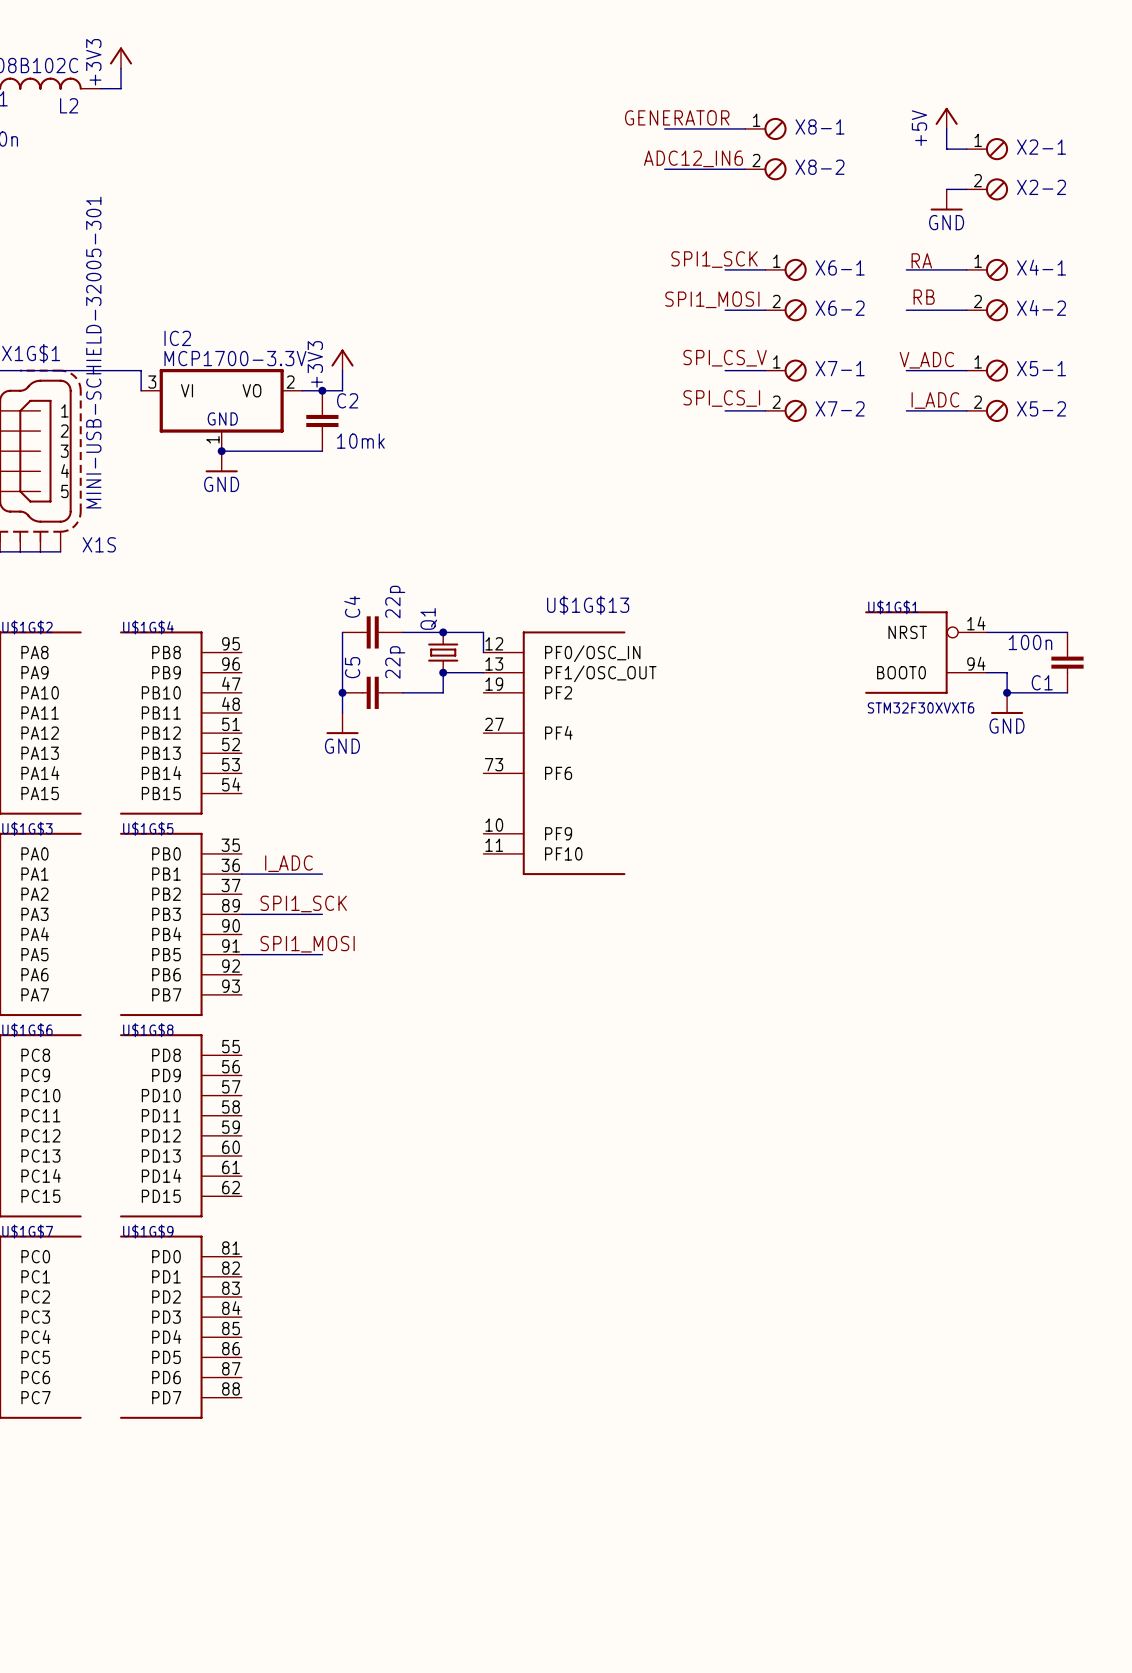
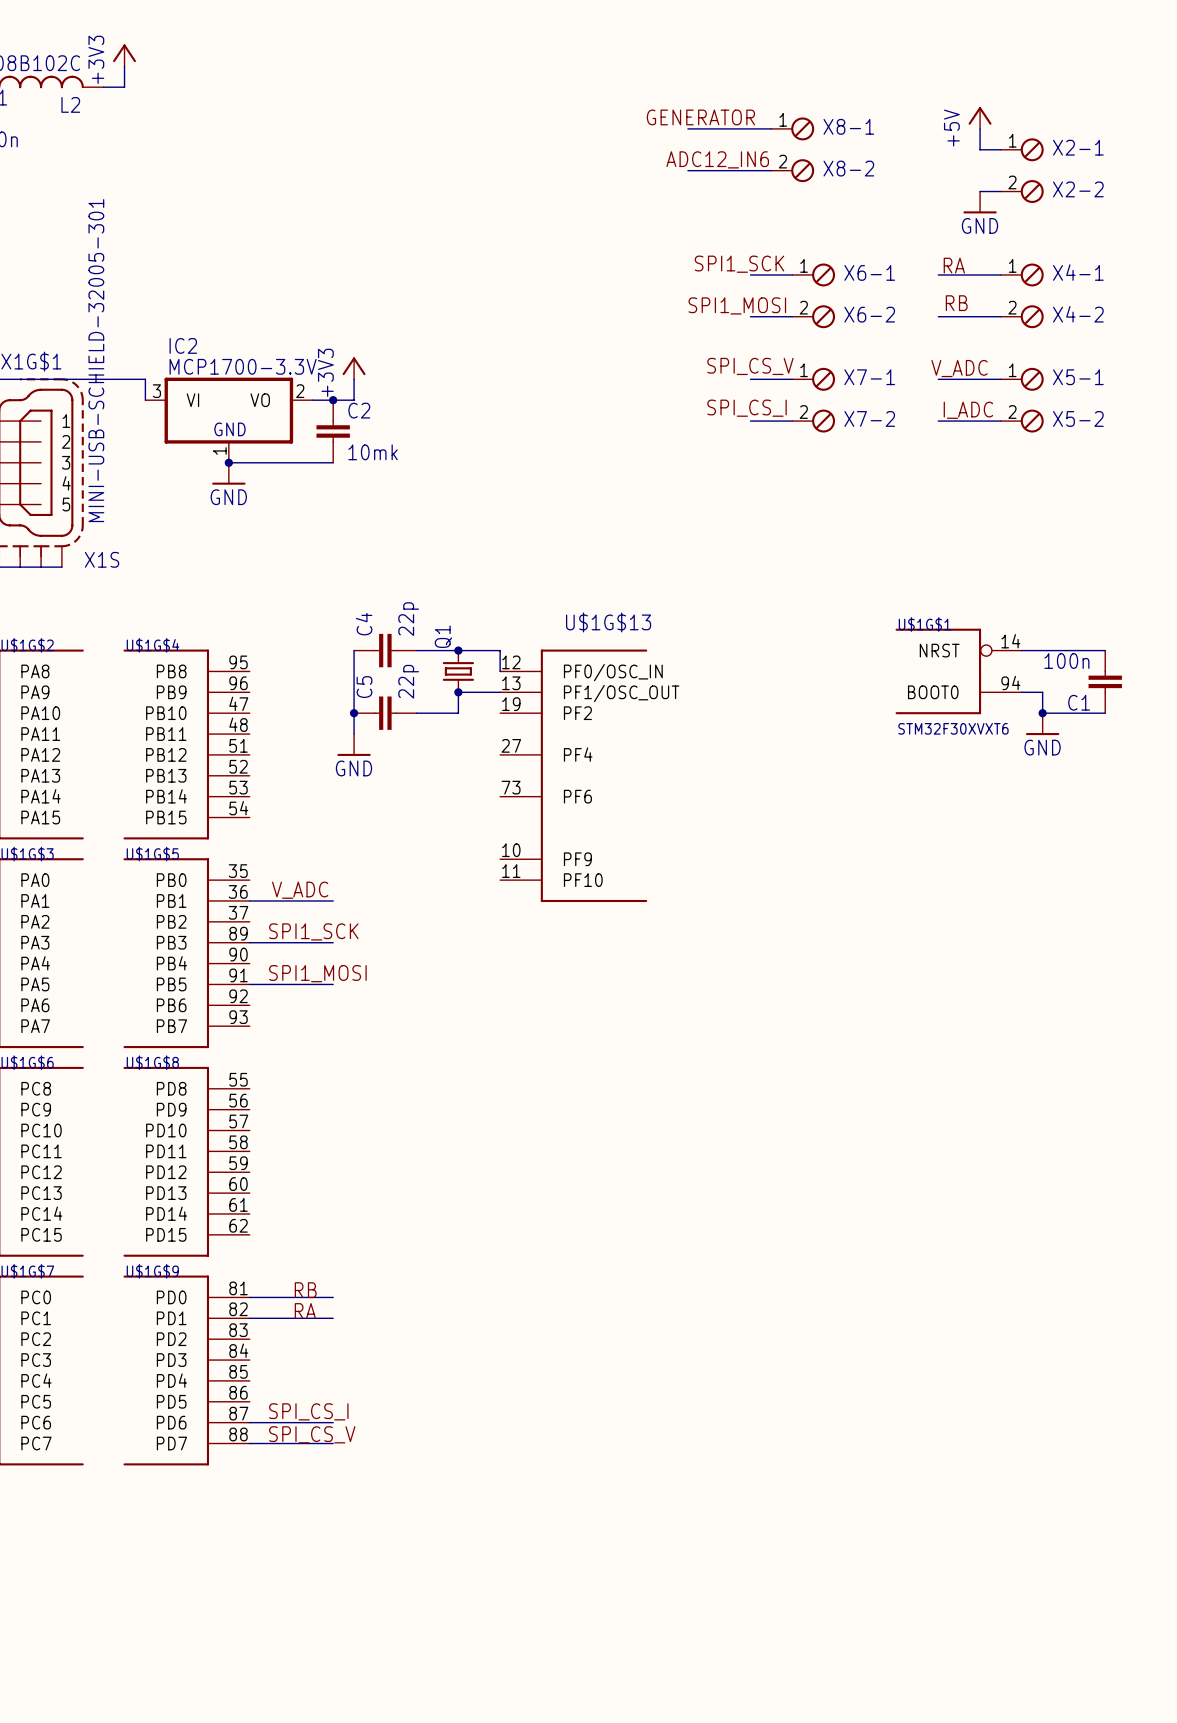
label: I_ADC (288, 863) -> V_ADC (300, 890)
label: none -> RB (305, 1290)
wire: none -> (249, 1297) (333, 1297)
label: none -> RA (305, 1311)
wire: none -> (249, 1318) (333, 1318)
label: none -> SPI_CS_I (308, 1411)
wire: none -> (249, 1422) (333, 1422)
label: none -> SPI_CS_V (312, 1434)
wire: none -> (249, 1443) (333, 1443)

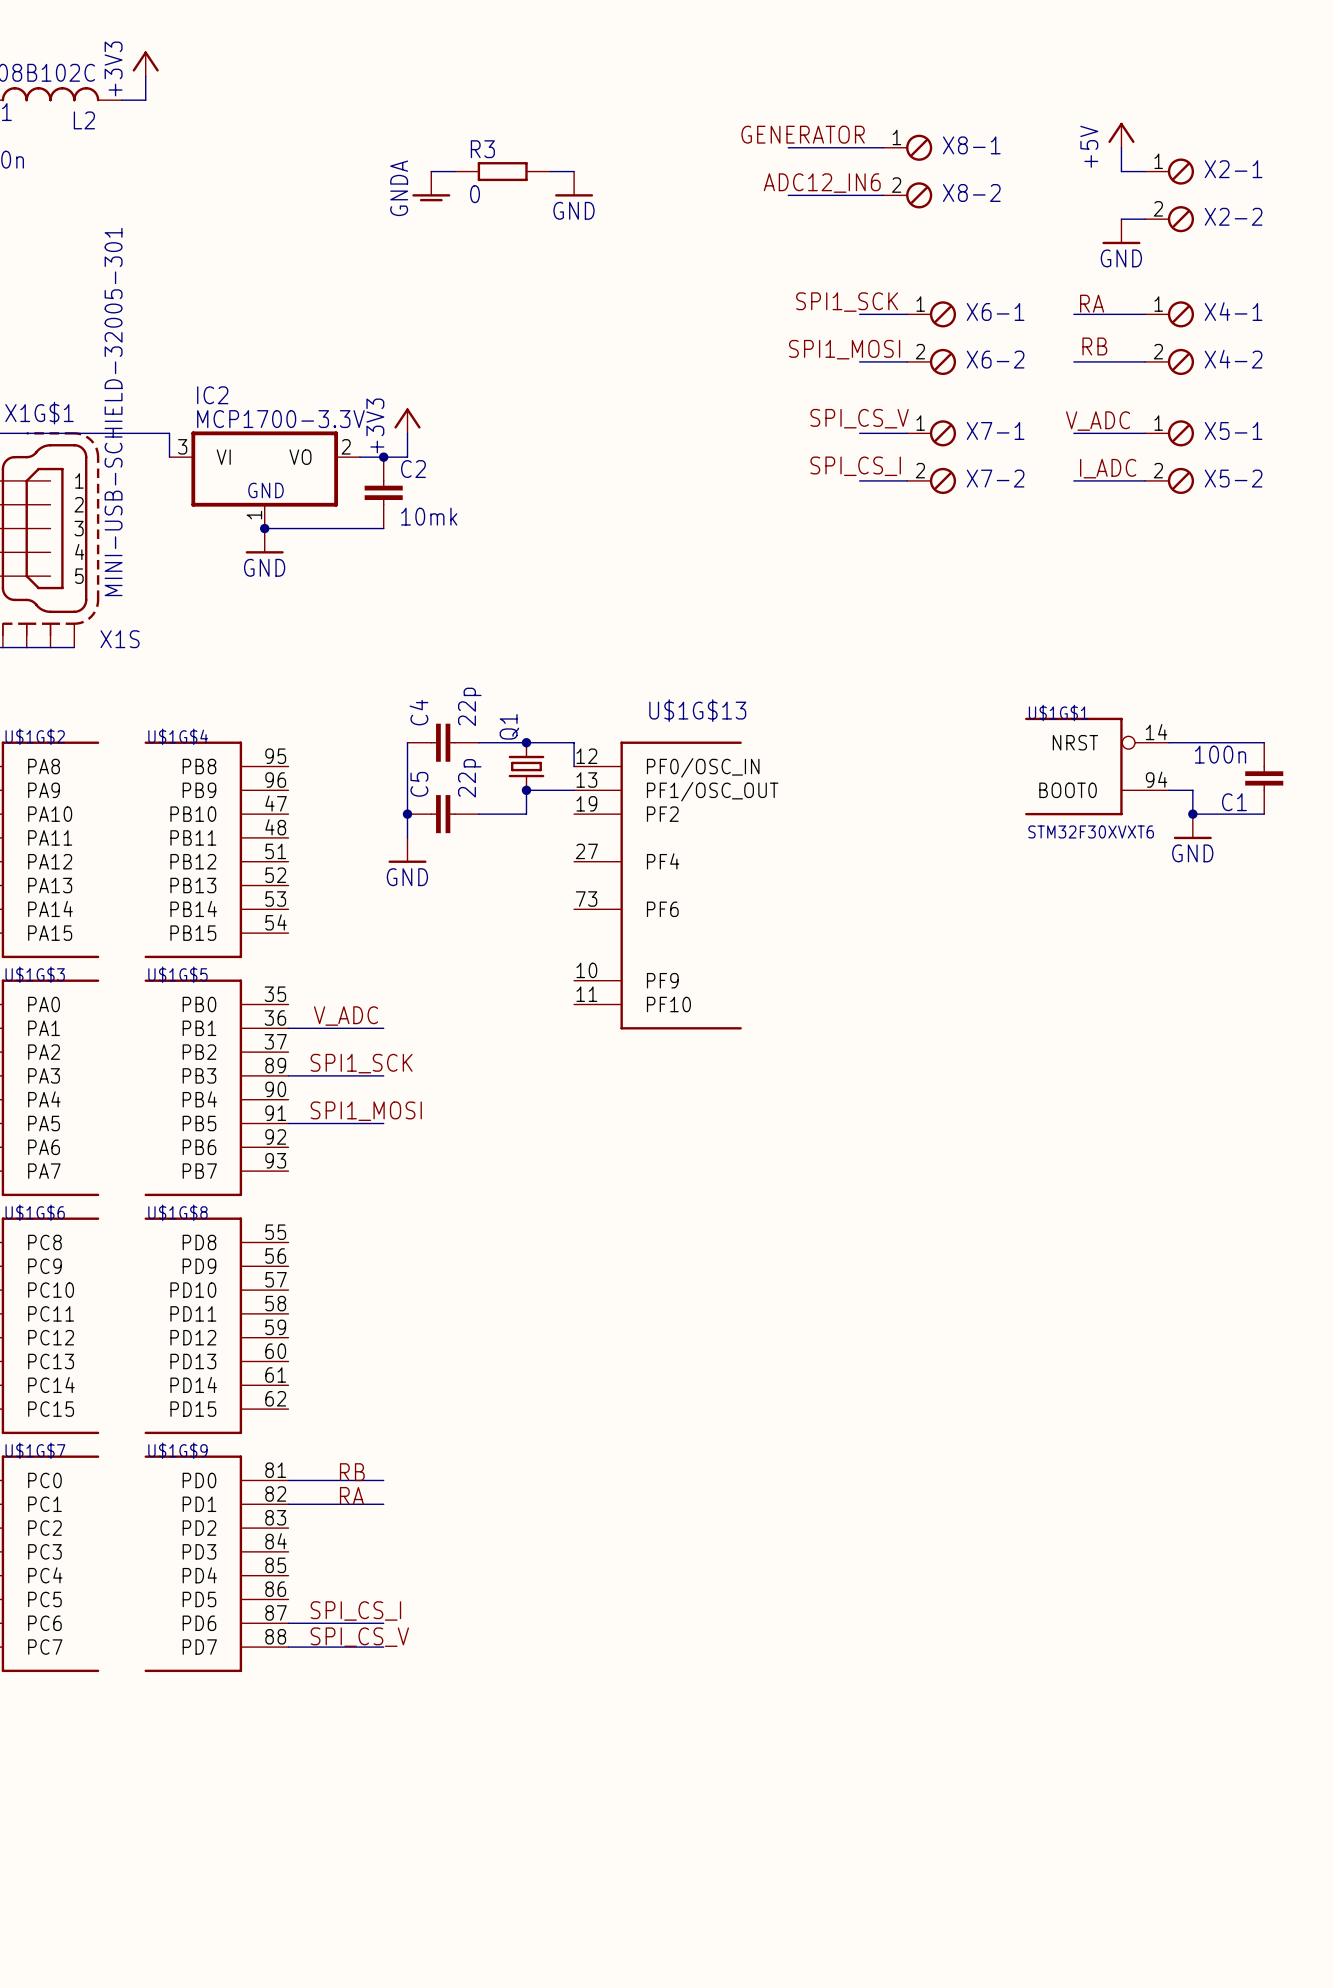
wire: none -> (431, 171) (455, 171)
R3: none -> 0 (502, 171)
wire: none -> (550, 171) (574, 171)
power symbol: none -> GND (574, 184)
power symbol: none -> GNDA (431, 186)

